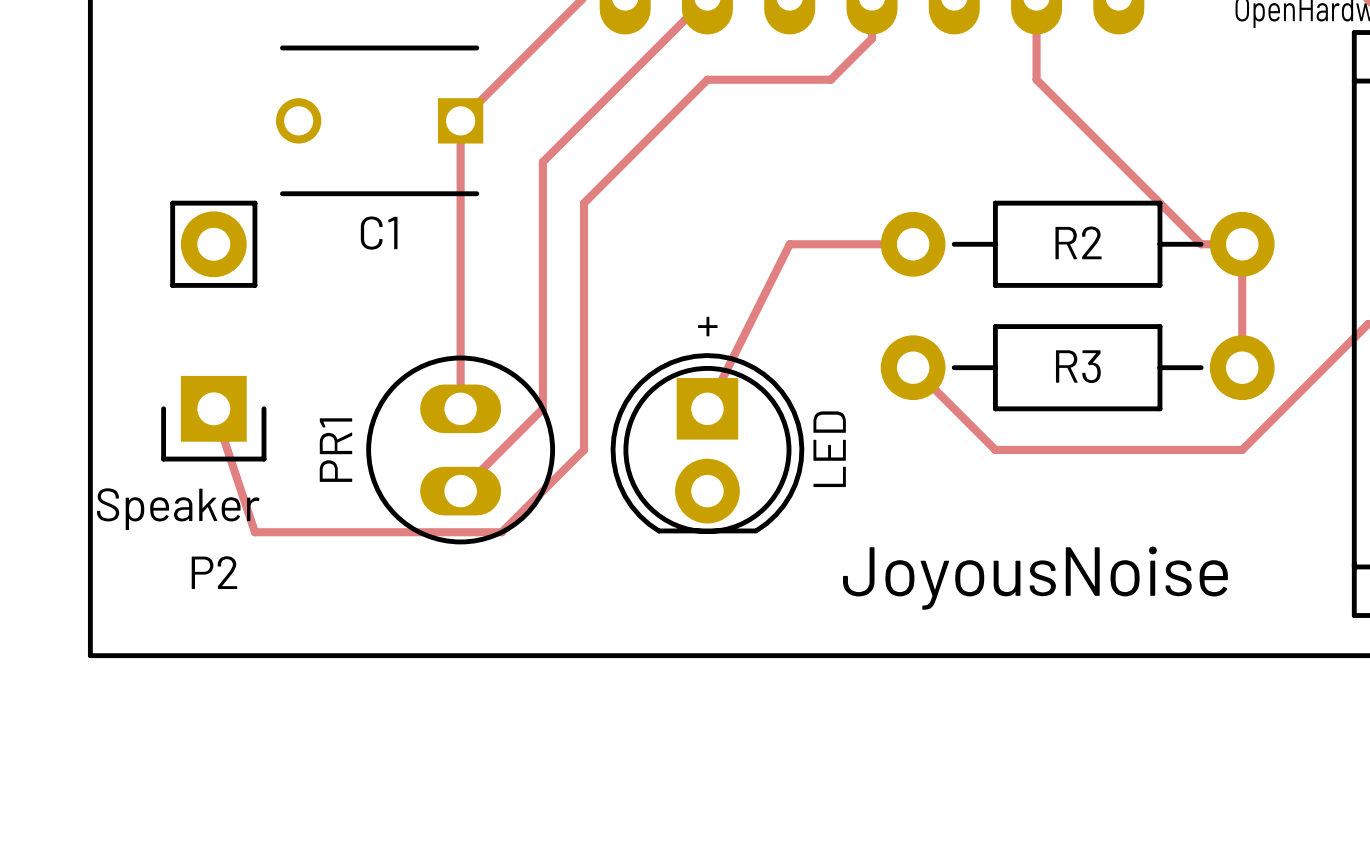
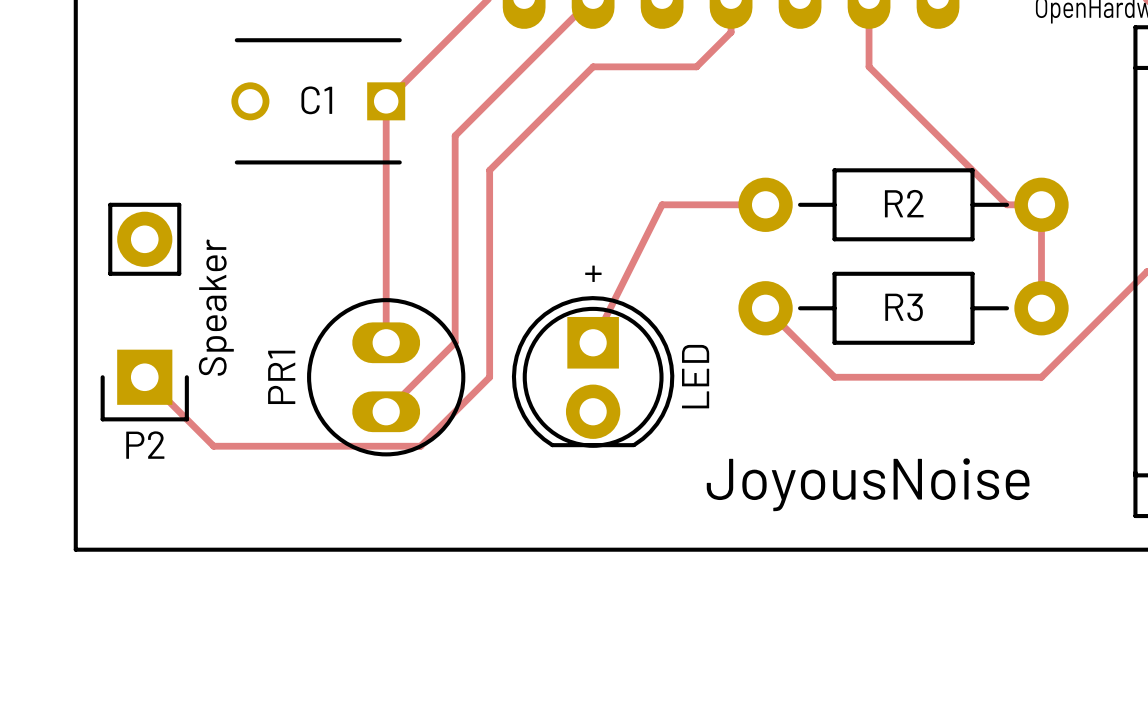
C1 name position: C1 (379, 233) -> C1 (316, 100)
P2 position: (213, 331) -> (144, 312)
top track: (213, 408) (254, 532) -> (144, 377) (213, 446)
P2 value rotation: 0° (178, 509) -> 90° counterclockwise (216, 307)
P2 name position: P2 (214, 572) -> P2 (145, 445)

